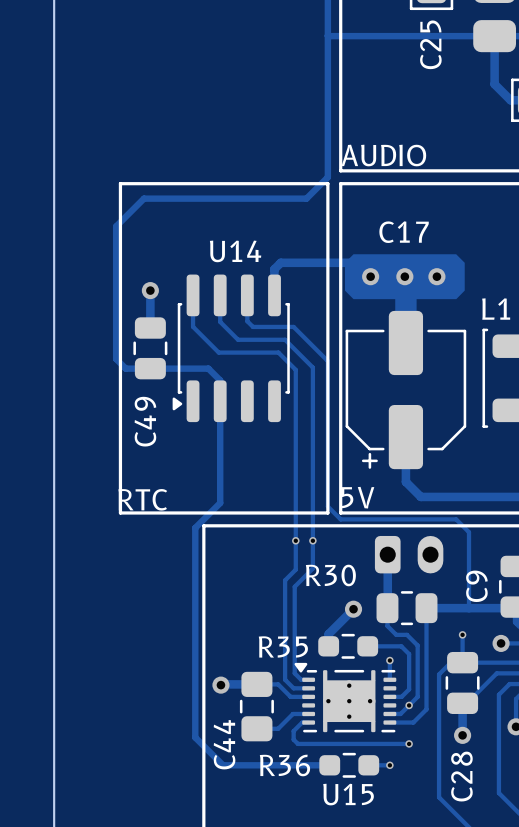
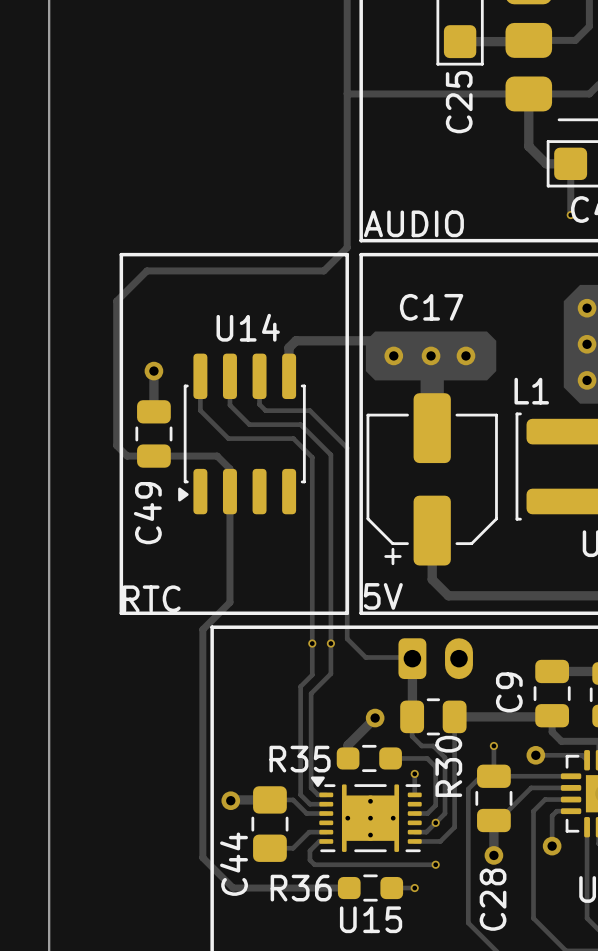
track: (327, 506) (340, 519) (456, 519) (469, 532) (469, 608) -> (347, 606) (347, 638) (365, 657) (411, 657)
R30 name rotation: 0° (330, 575) -> 90° counterclockwise (448, 766)
R30 name position: R30 (330, 575) -> R30 (448, 766)

